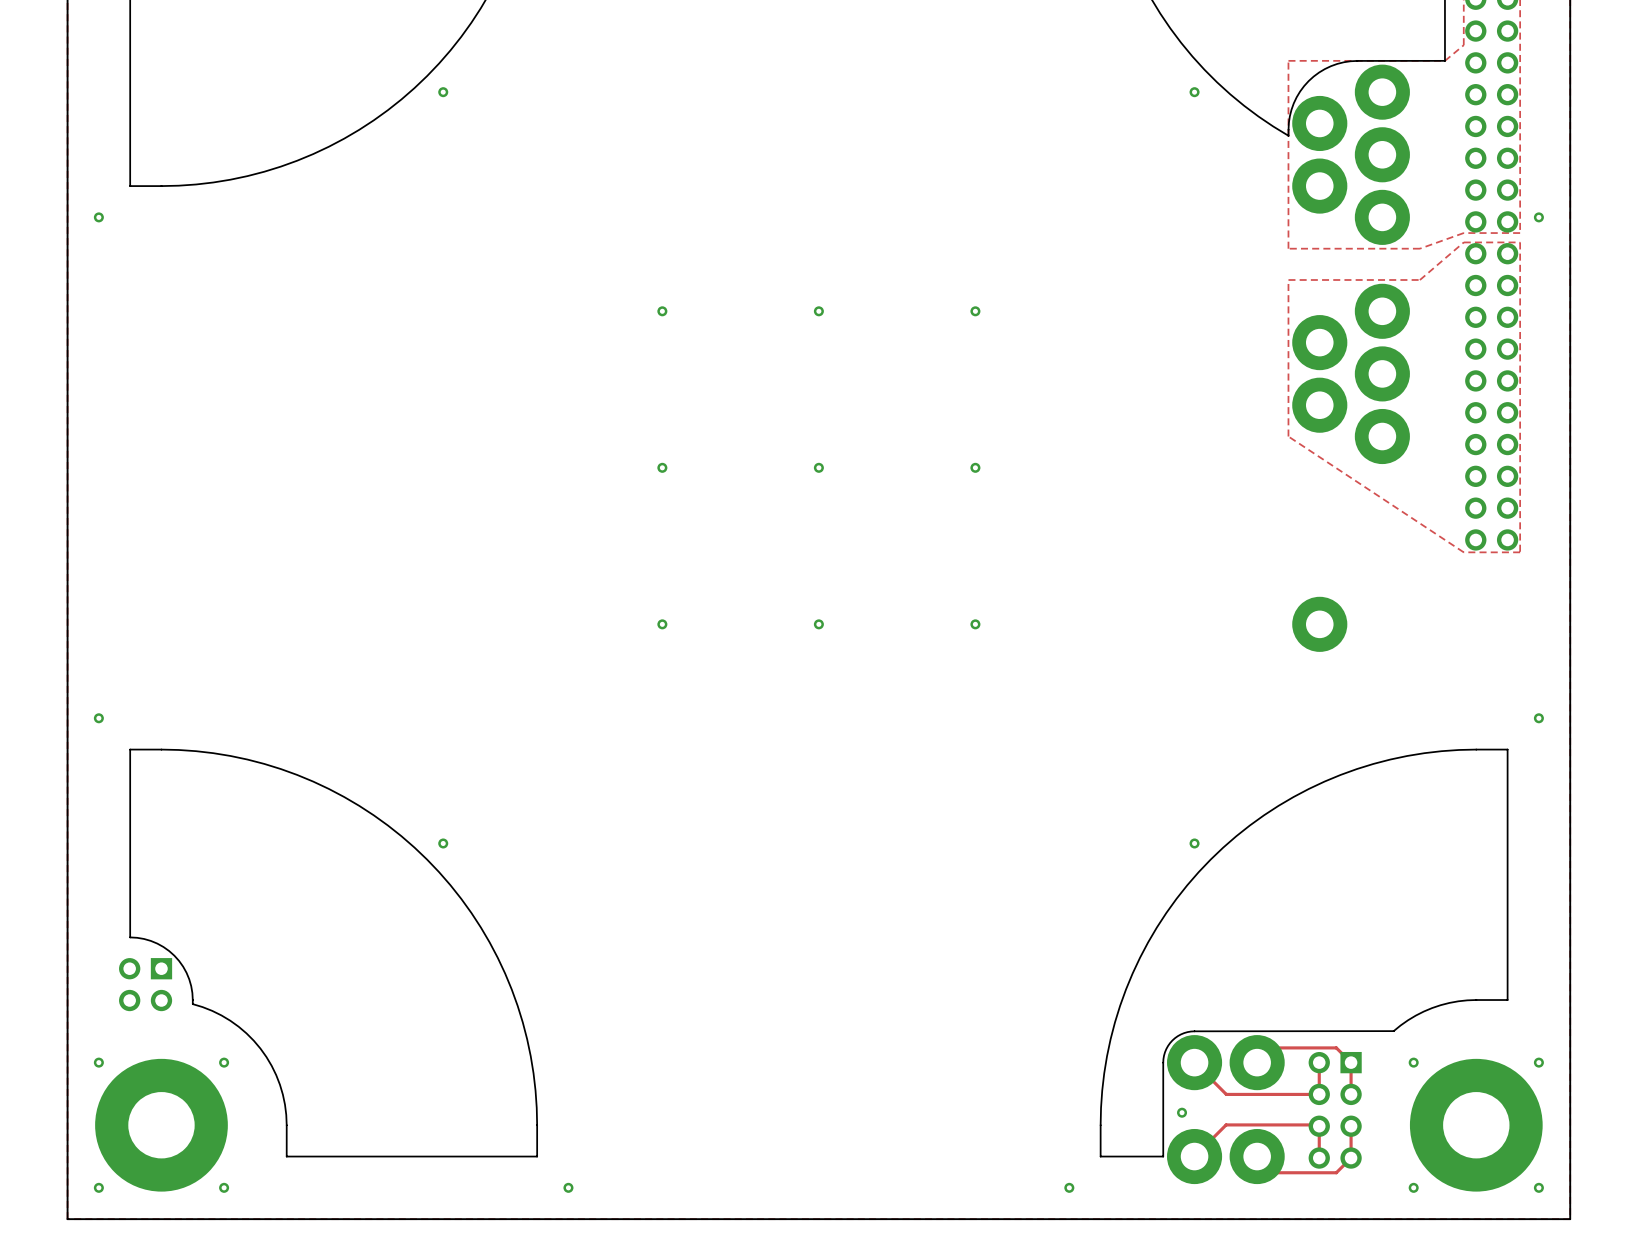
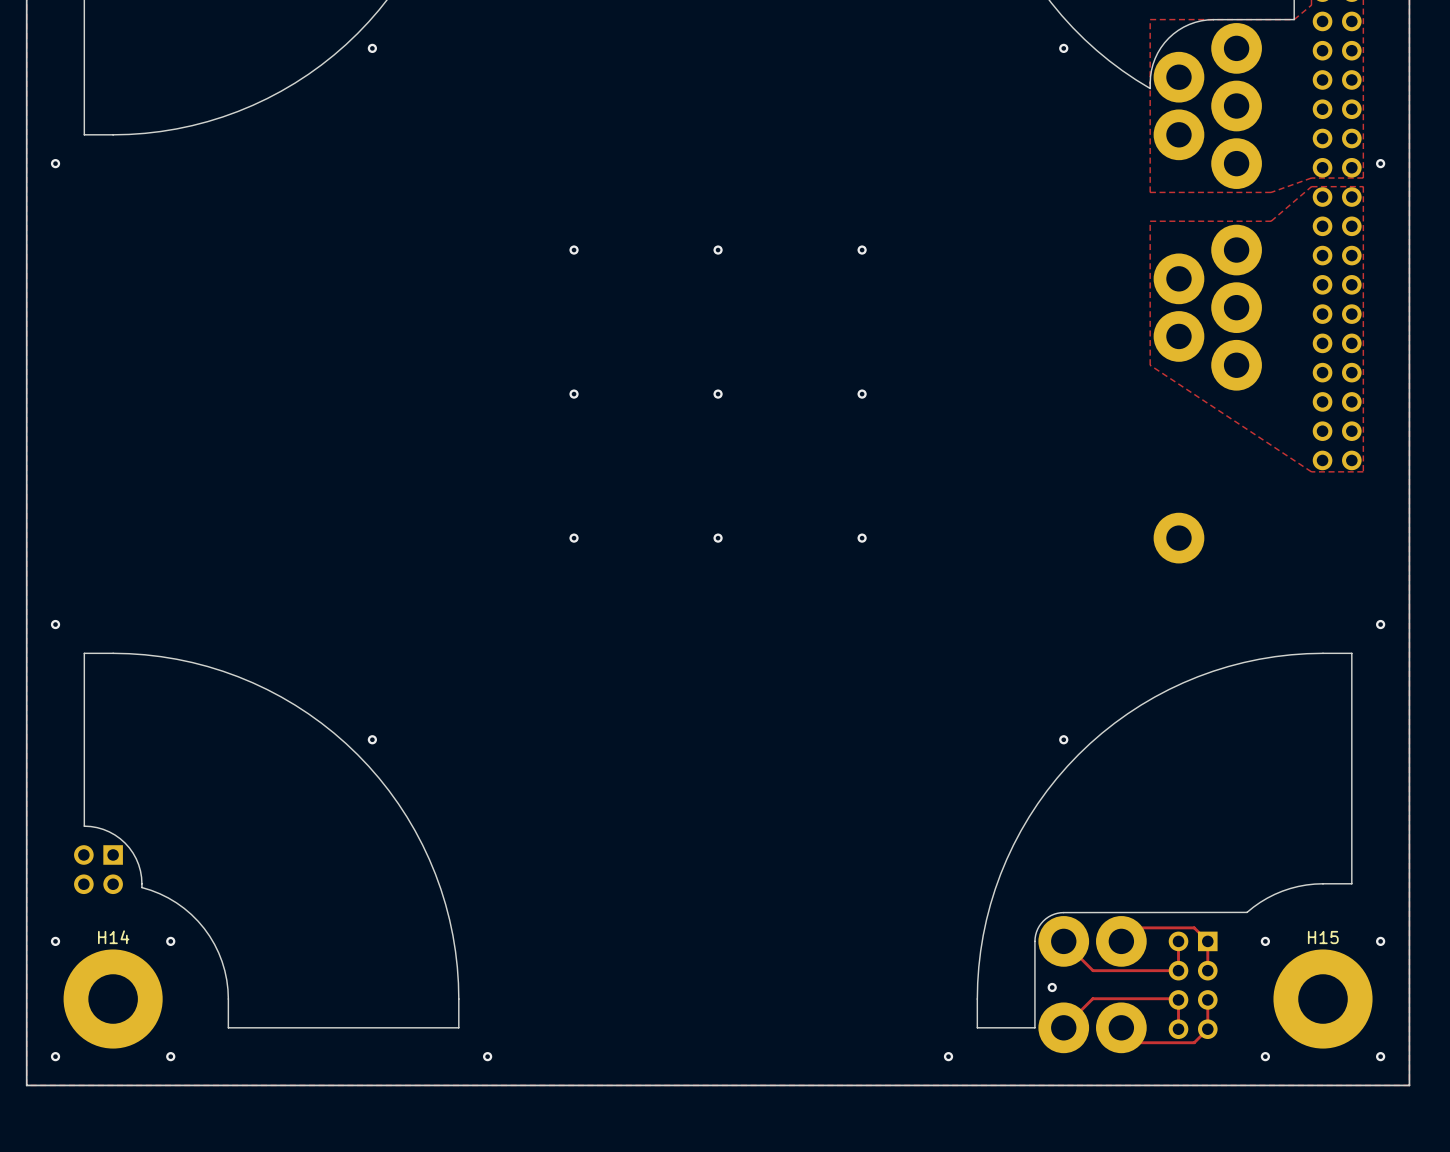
part: (161, 1125) -> none
H14: none -> (113, 999)
part: (1476, 1125) -> none
H15: none -> (1323, 999)

